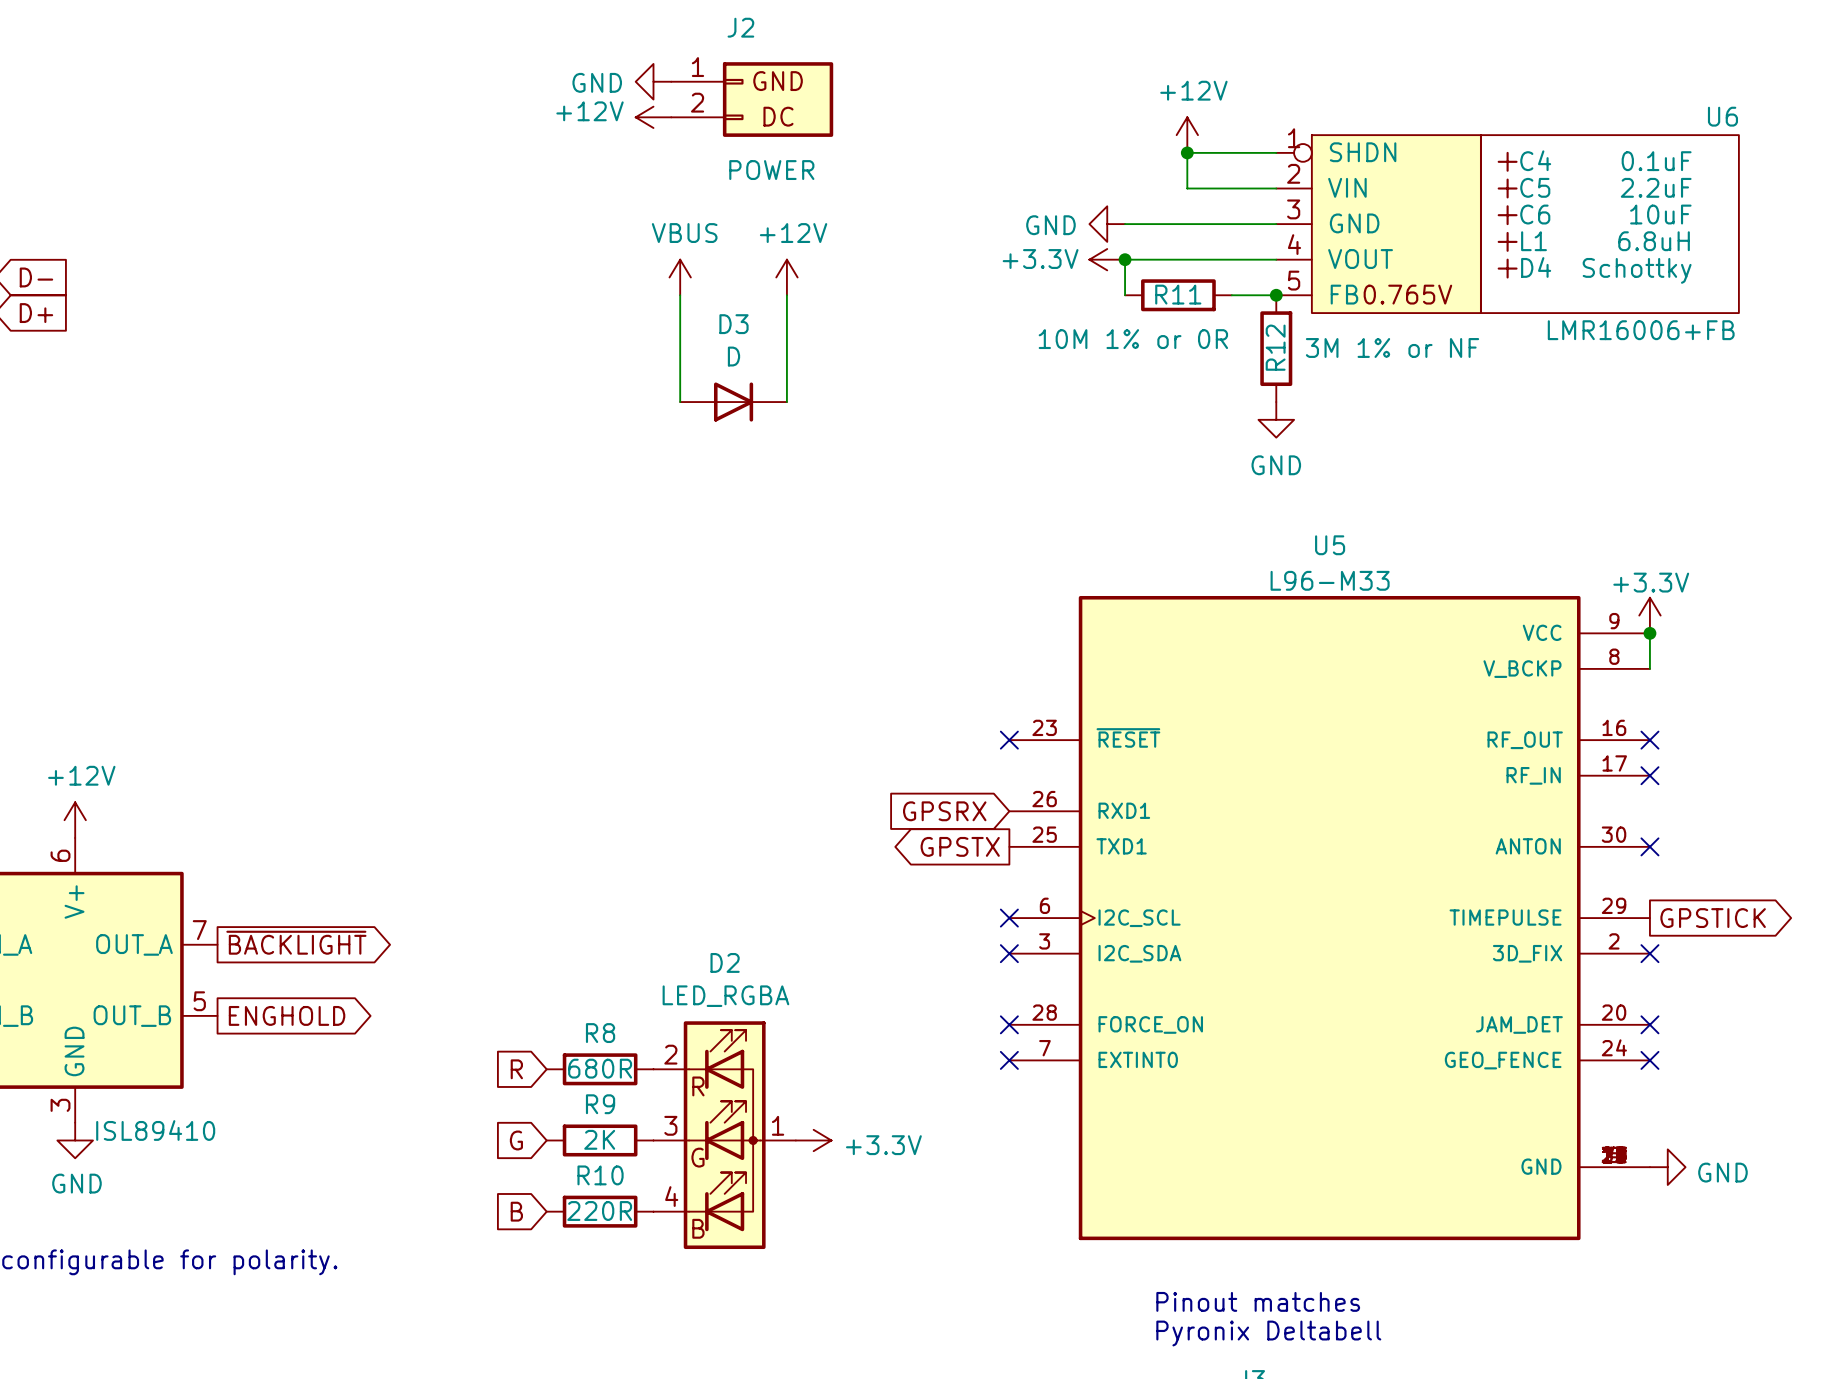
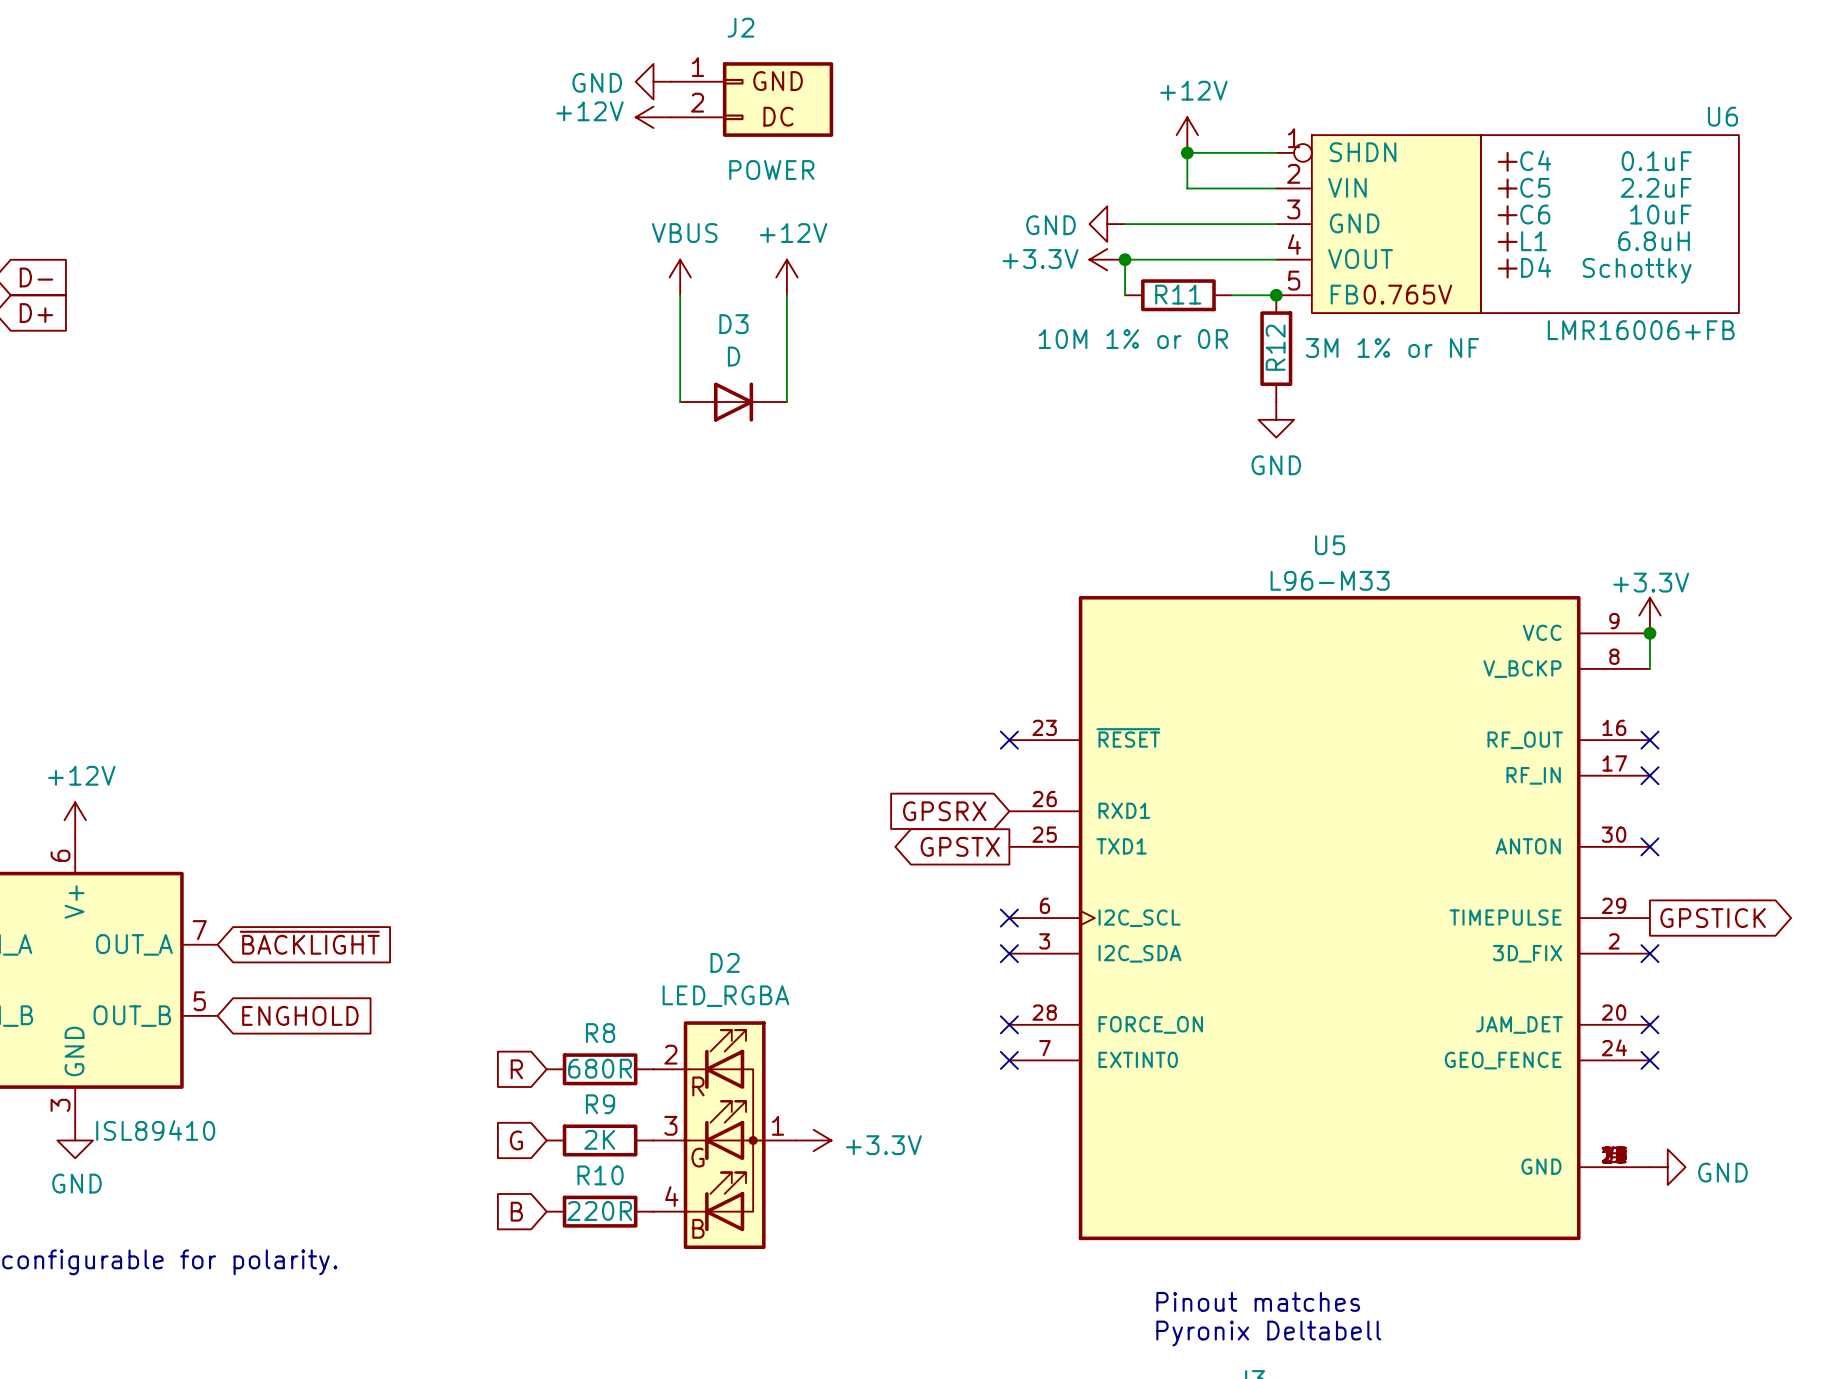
global label shape: output (296, 942) -> input (309, 942)
global label shape: output (287, 1015) -> input (300, 1015)

